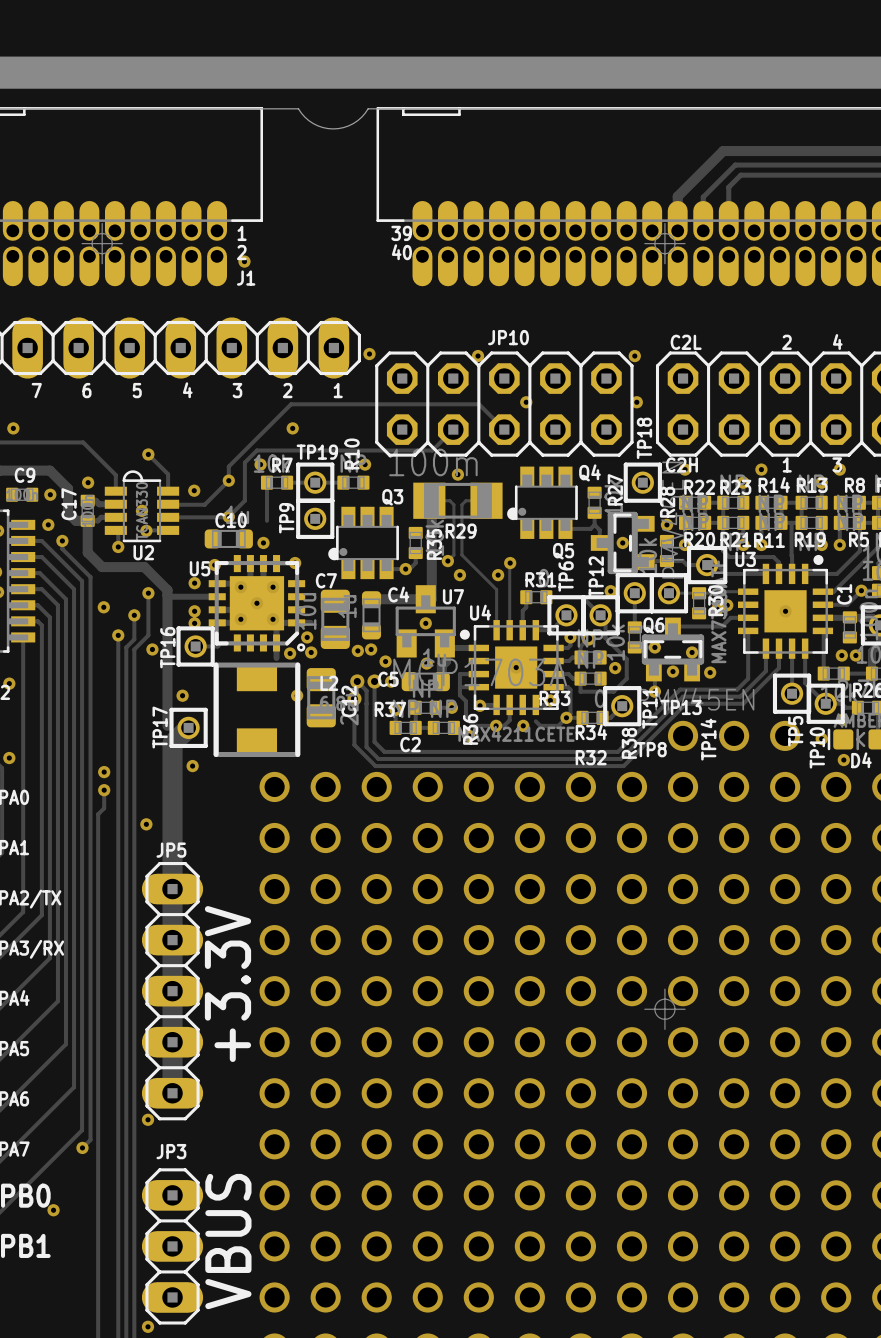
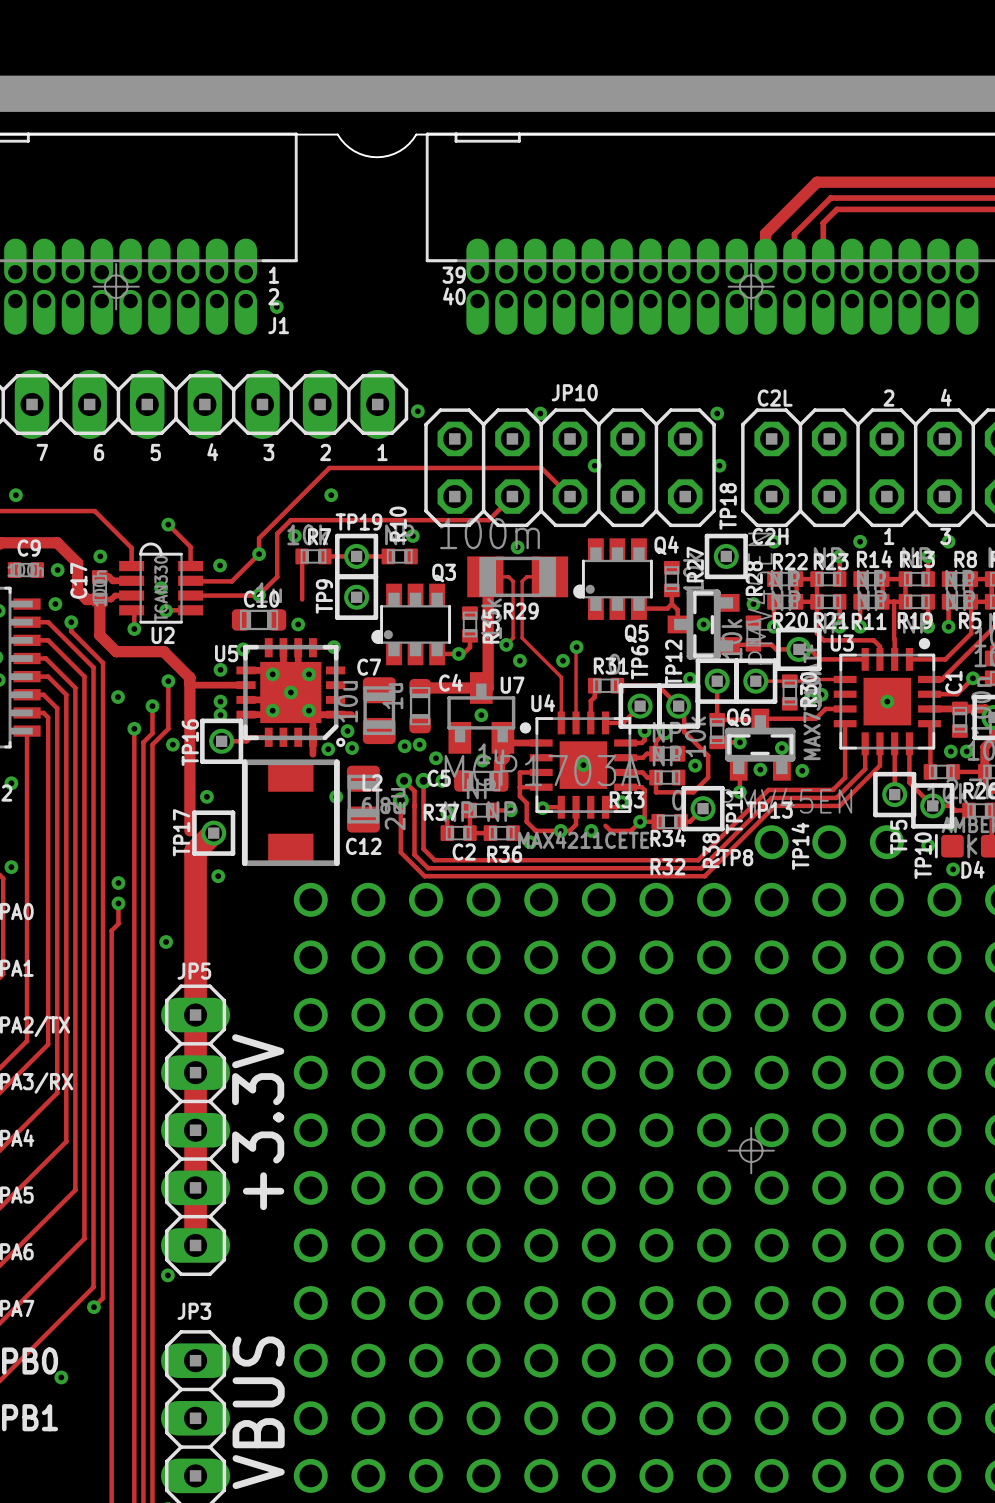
C12 name rotation: 0° (349, 701) -> 90° clockwise (363, 846)
C12 name position: C12 (349, 701) -> C12 (363, 846)
R36 name rotation: 0° (470, 729) -> 90° clockwise (504, 854)

